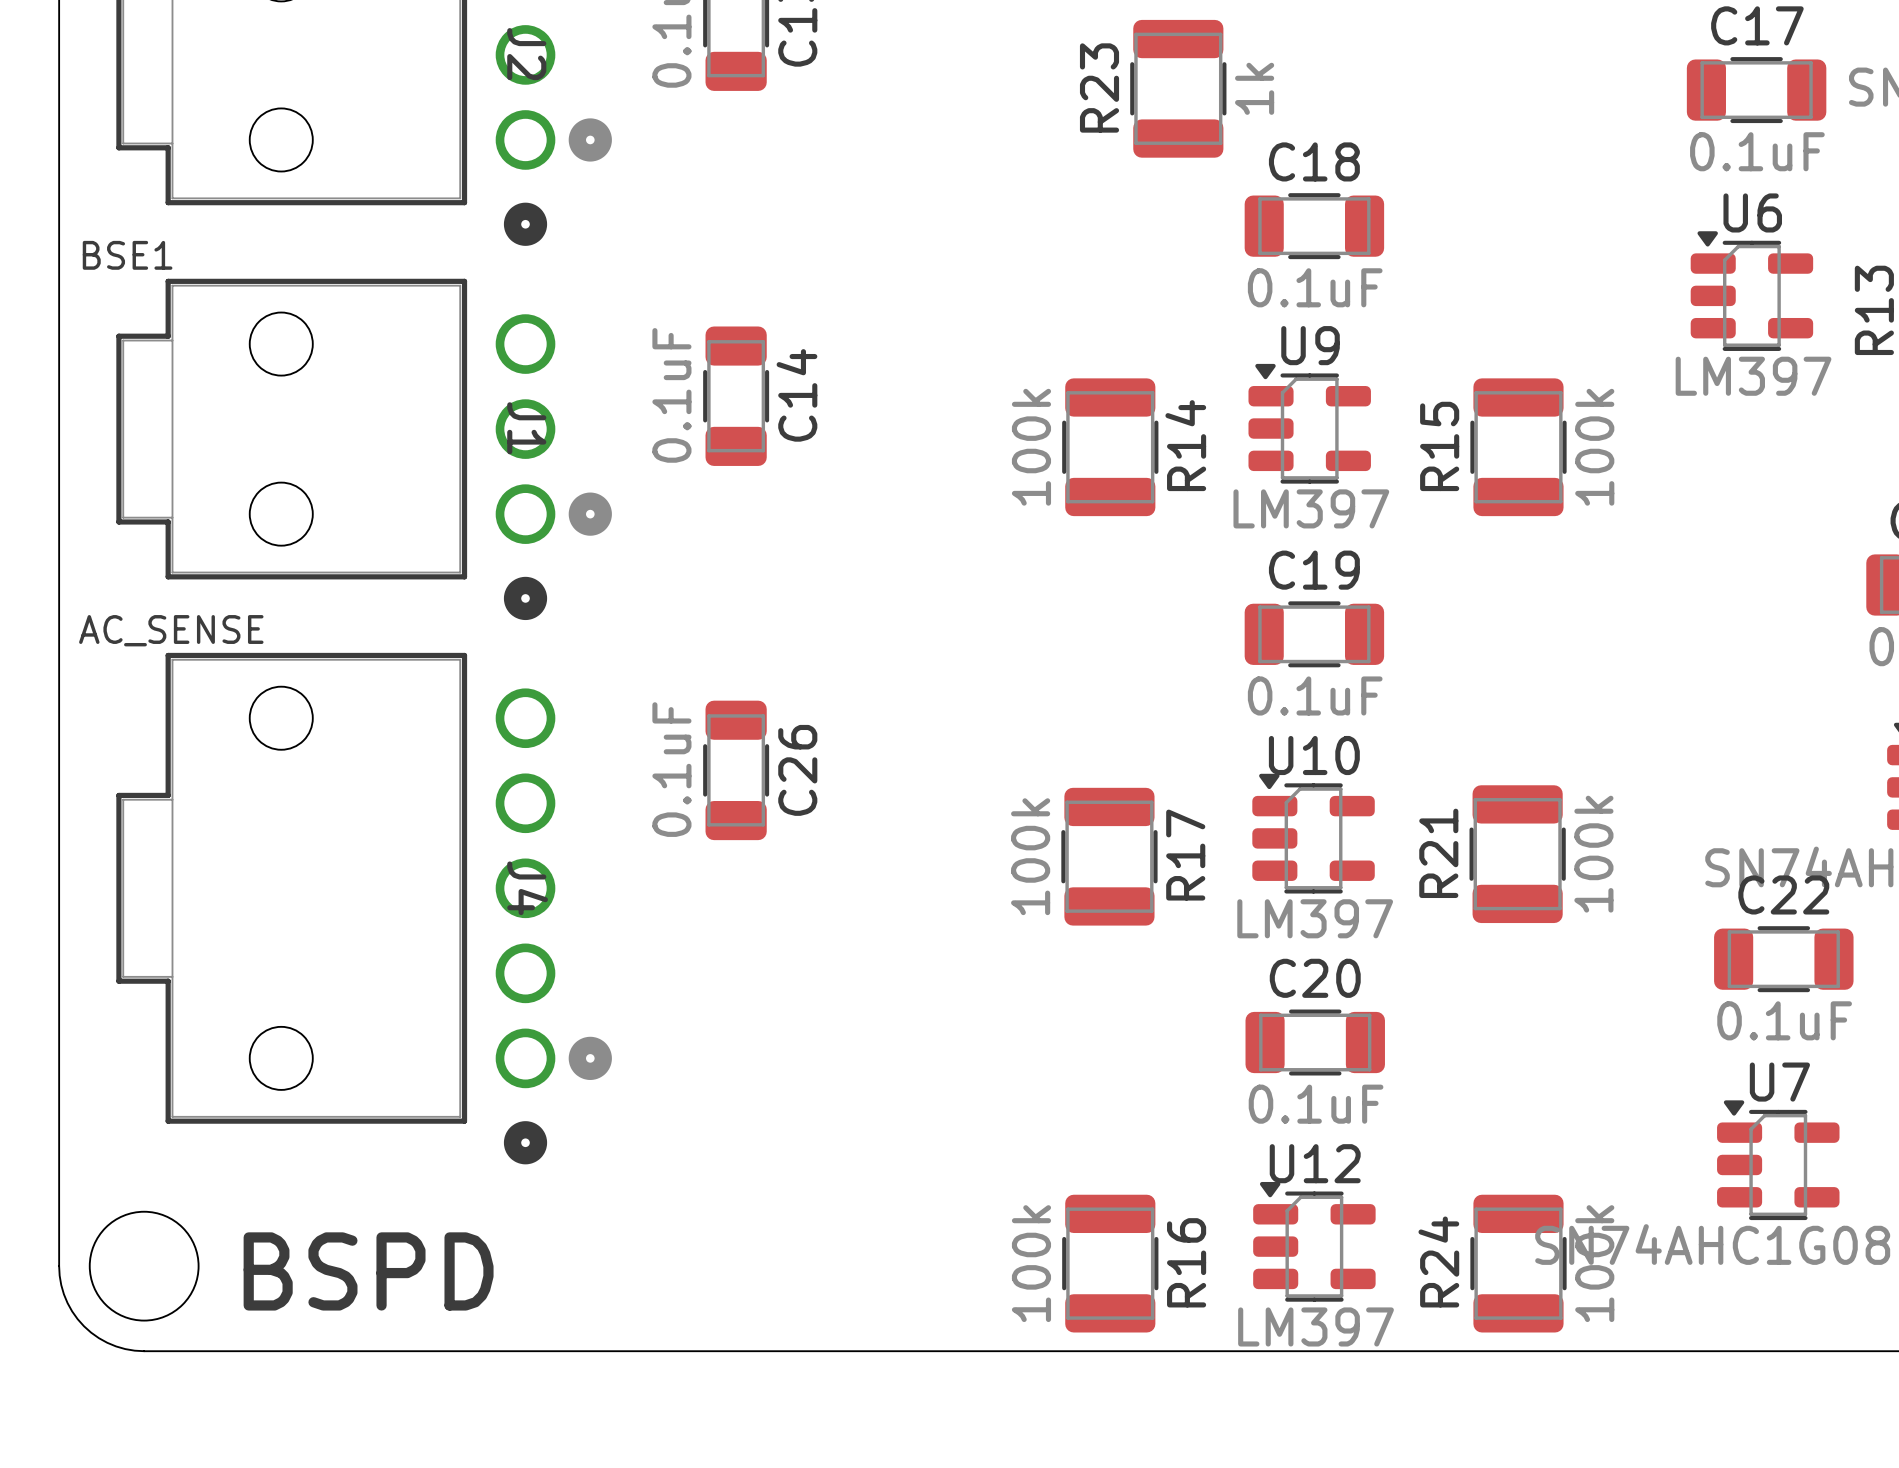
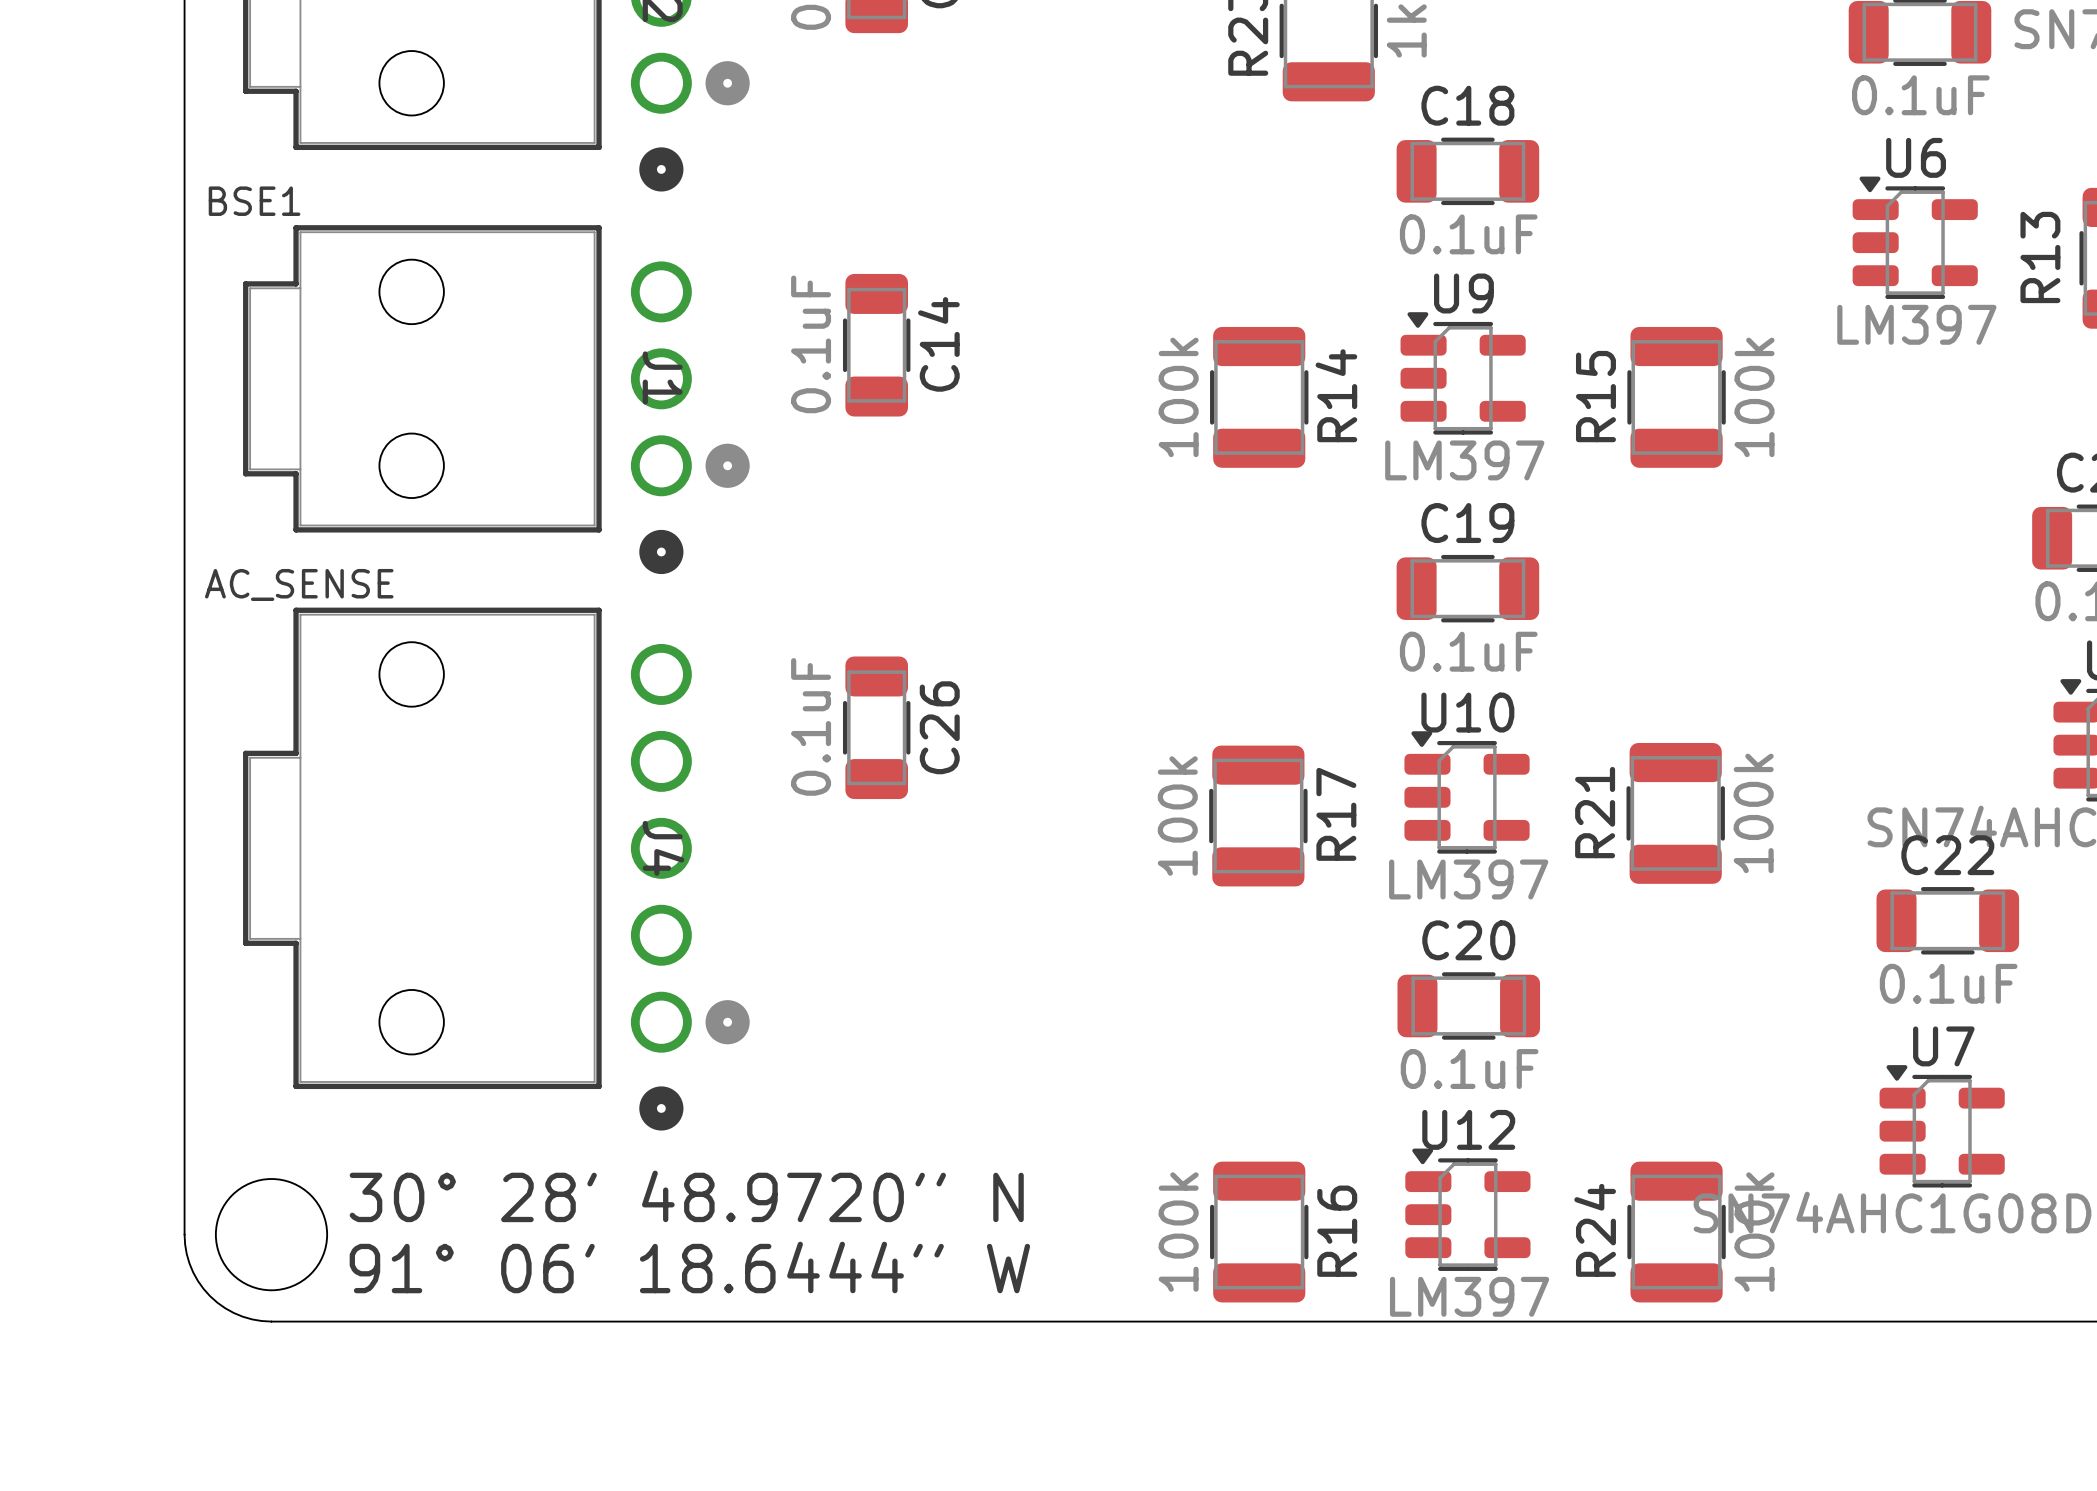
text: none -> 30° 28' 48.9720'' N (686, 1196)
text: BSPD (368, 1271) -> none
text: none -> 91° 06' 18.6444'' W (689, 1267)

